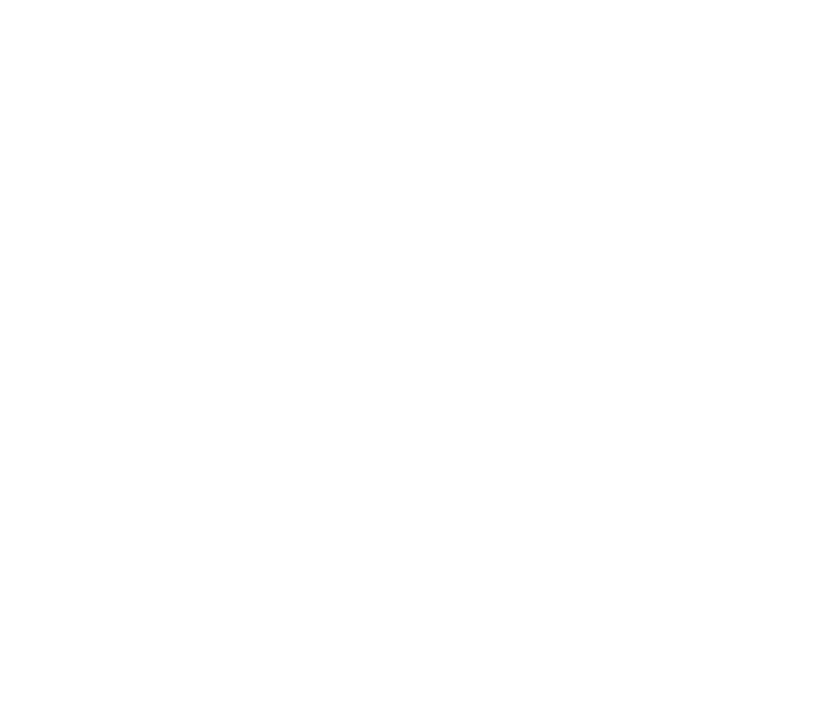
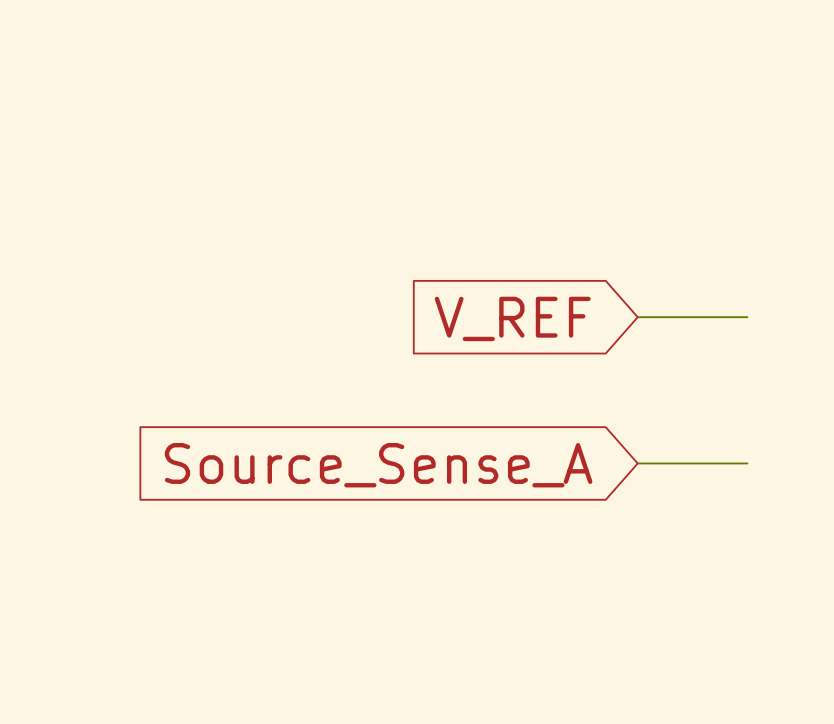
wire: none -> (637, 317) (747, 317)
global label: none -> V_REF (512, 318)
wire: none -> (637, 463) (747, 463)
global label: none -> Source_Sense_A (378, 465)

